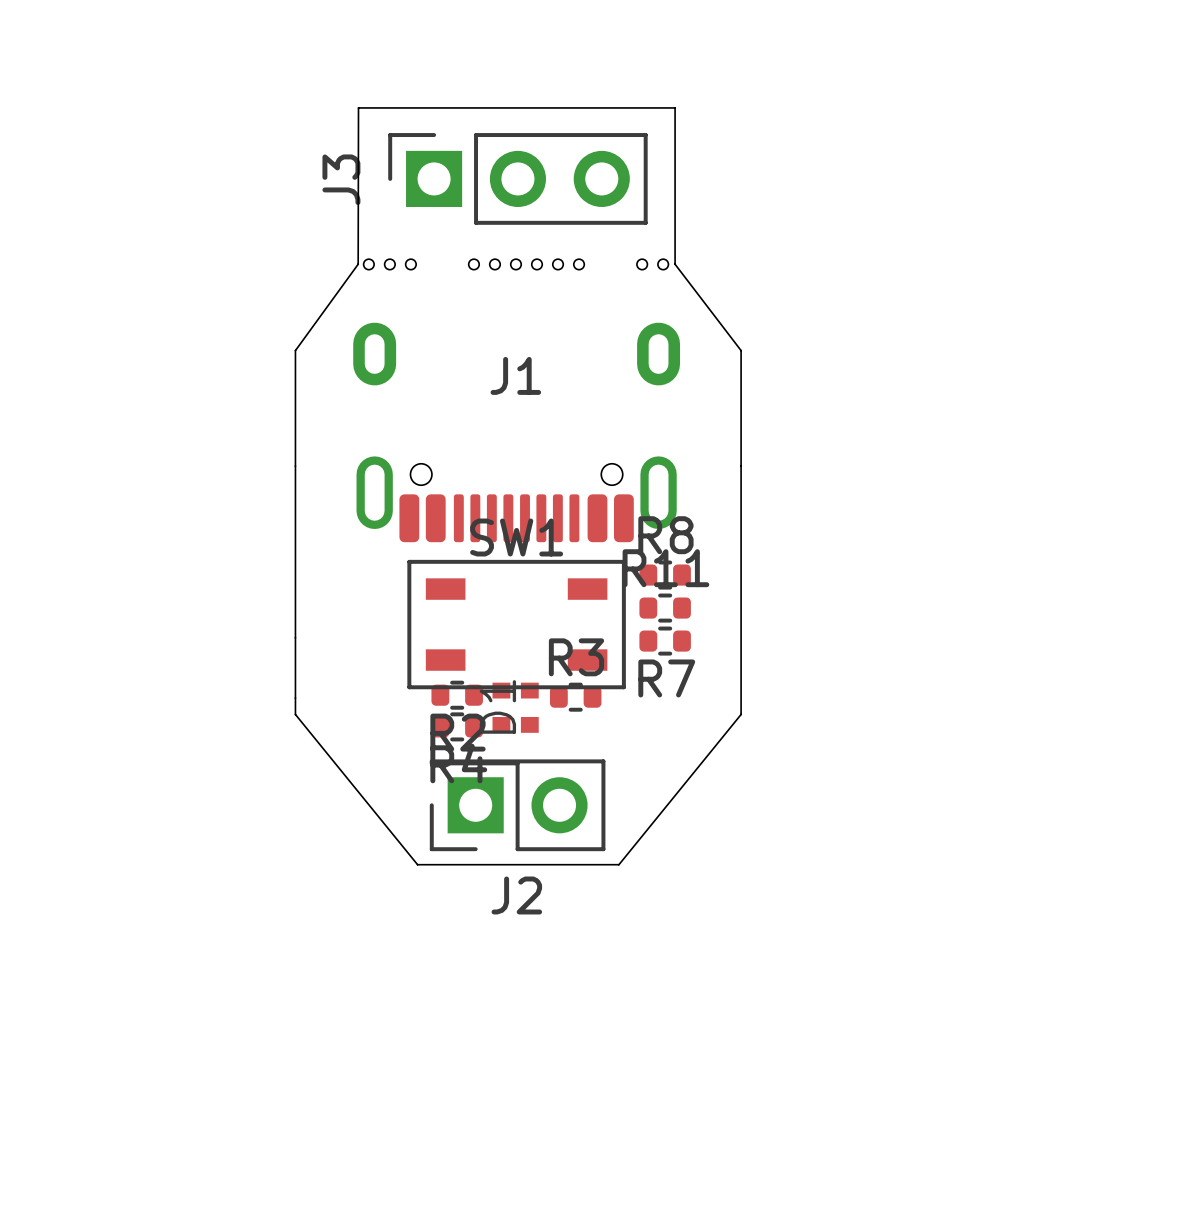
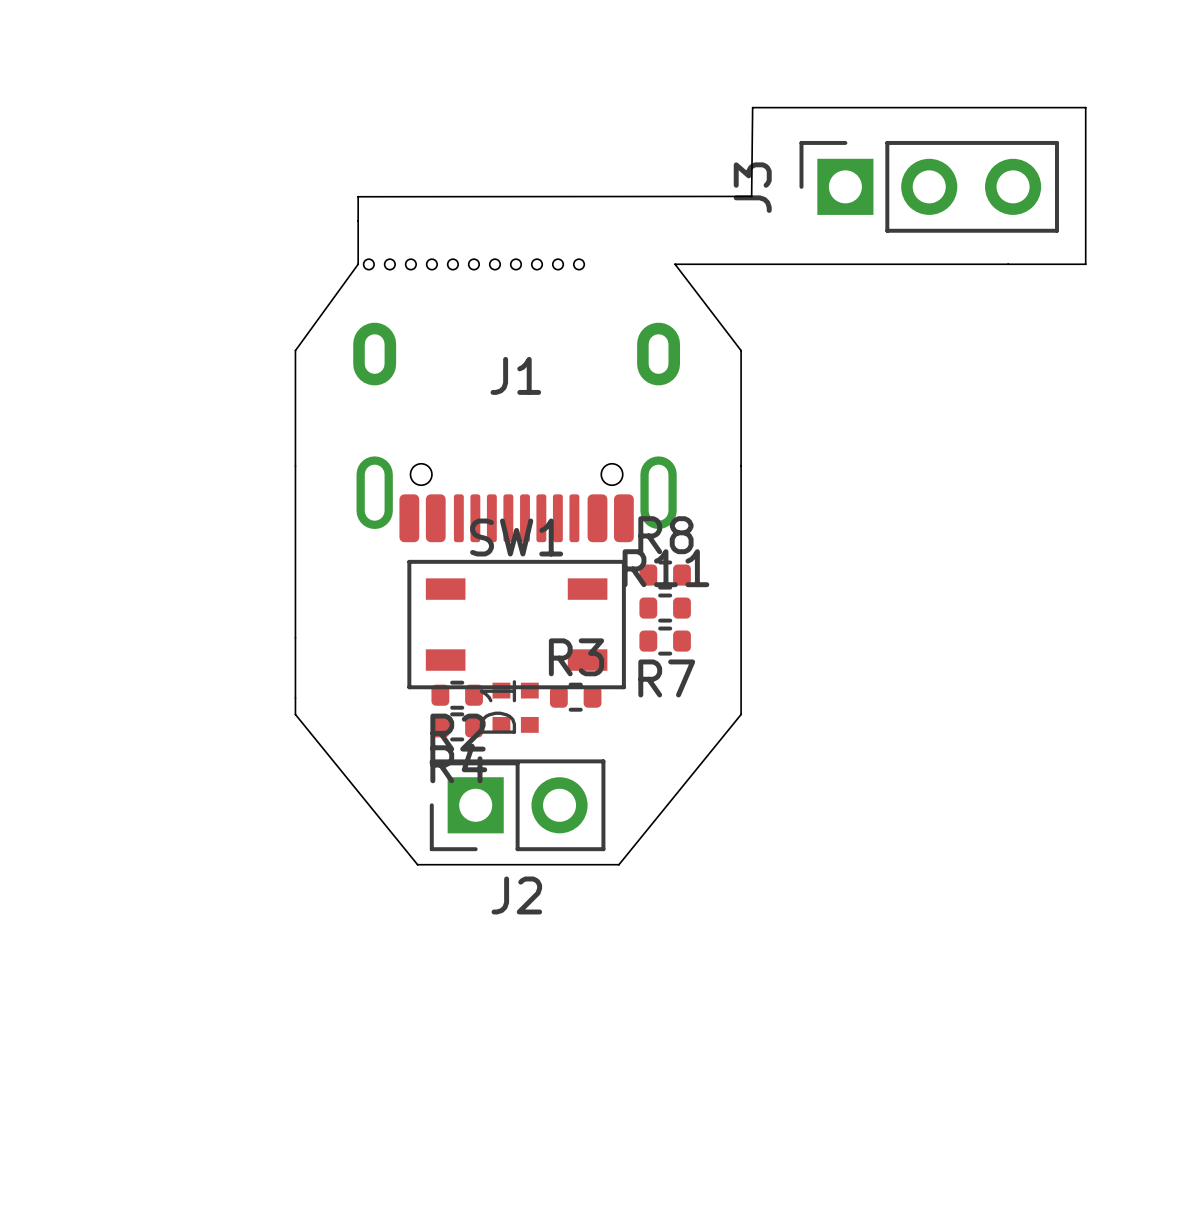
J3 position: (517, 178) -> (929, 186)
round board edge: none -> [425, 258, 438, 271]
round board edge: none -> [446, 258, 460, 271]
round board edge: [636, 258, 649, 271] -> none
round board edge: [657, 258, 670, 271] -> none
board edge: (358, 264) (358, 107) (675, 107) (675, 264) -> (358, 264) (358, 196) (751, 196) (752, 107) (1085, 107) (1085, 264) (675, 264)

